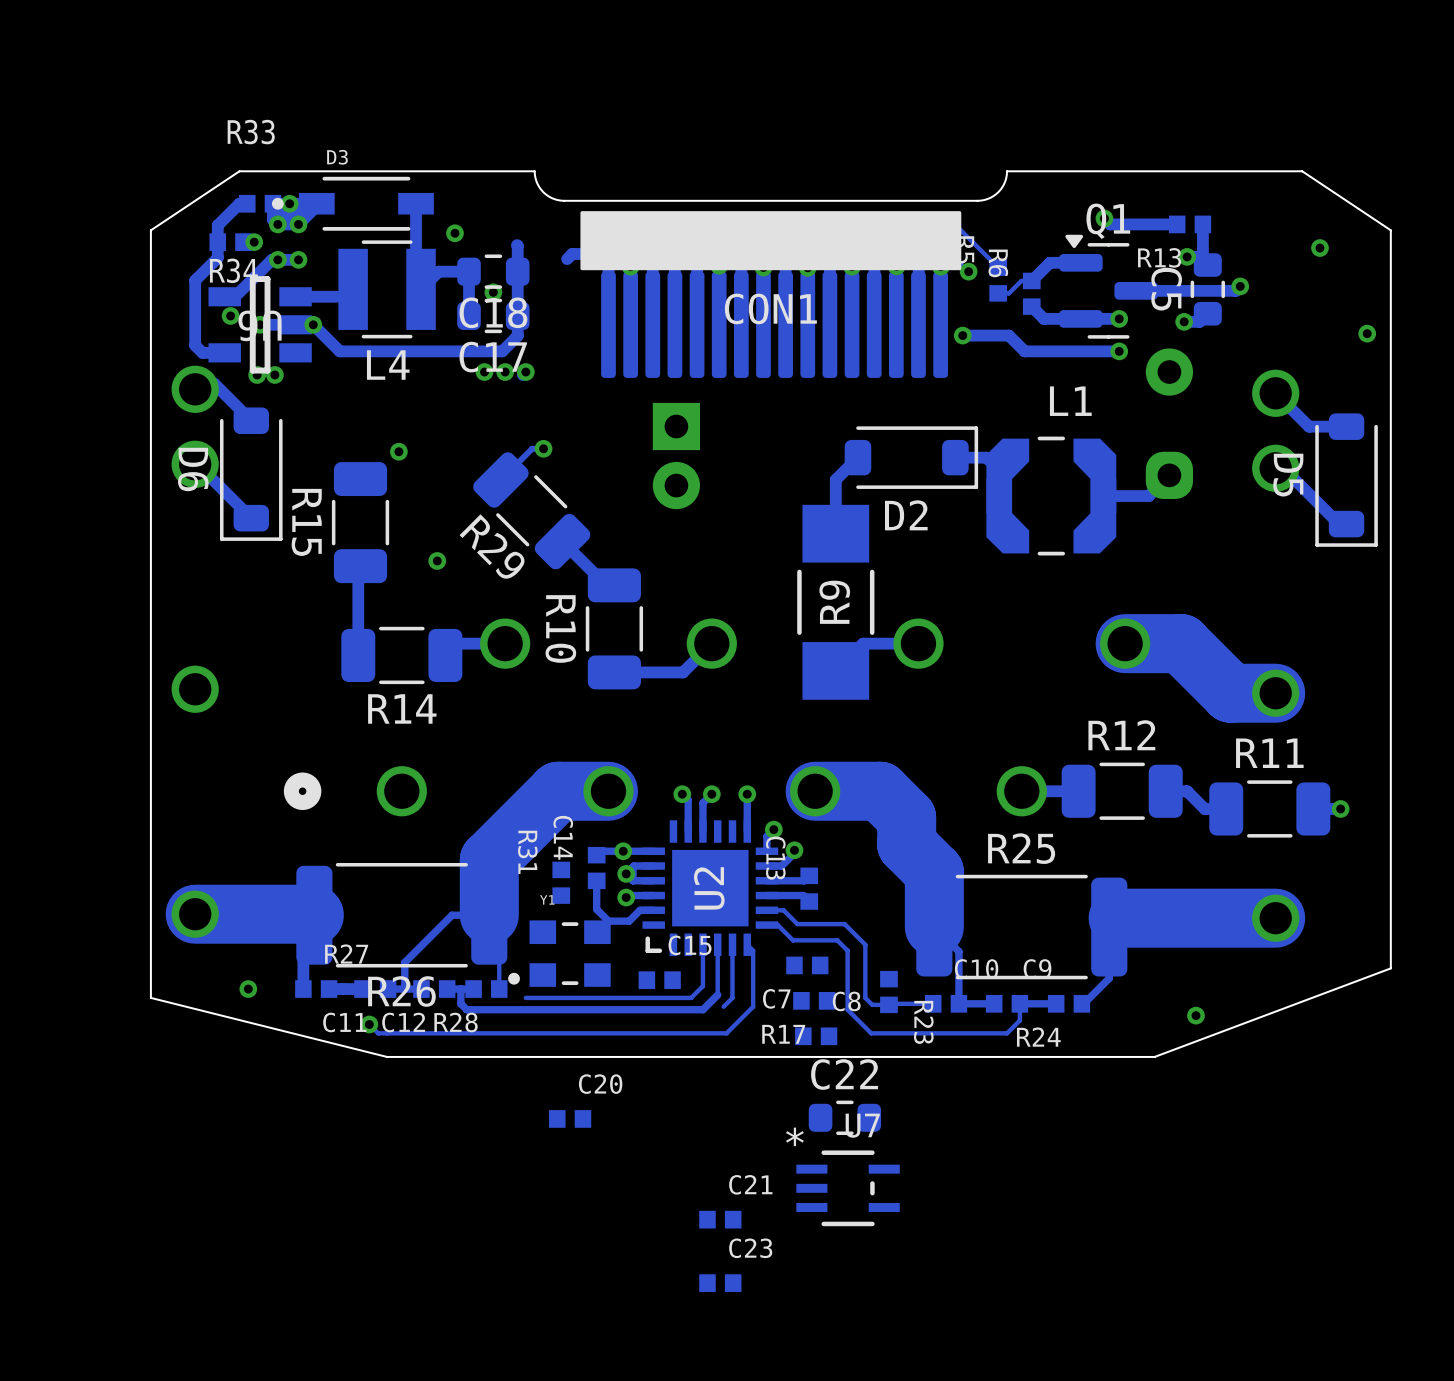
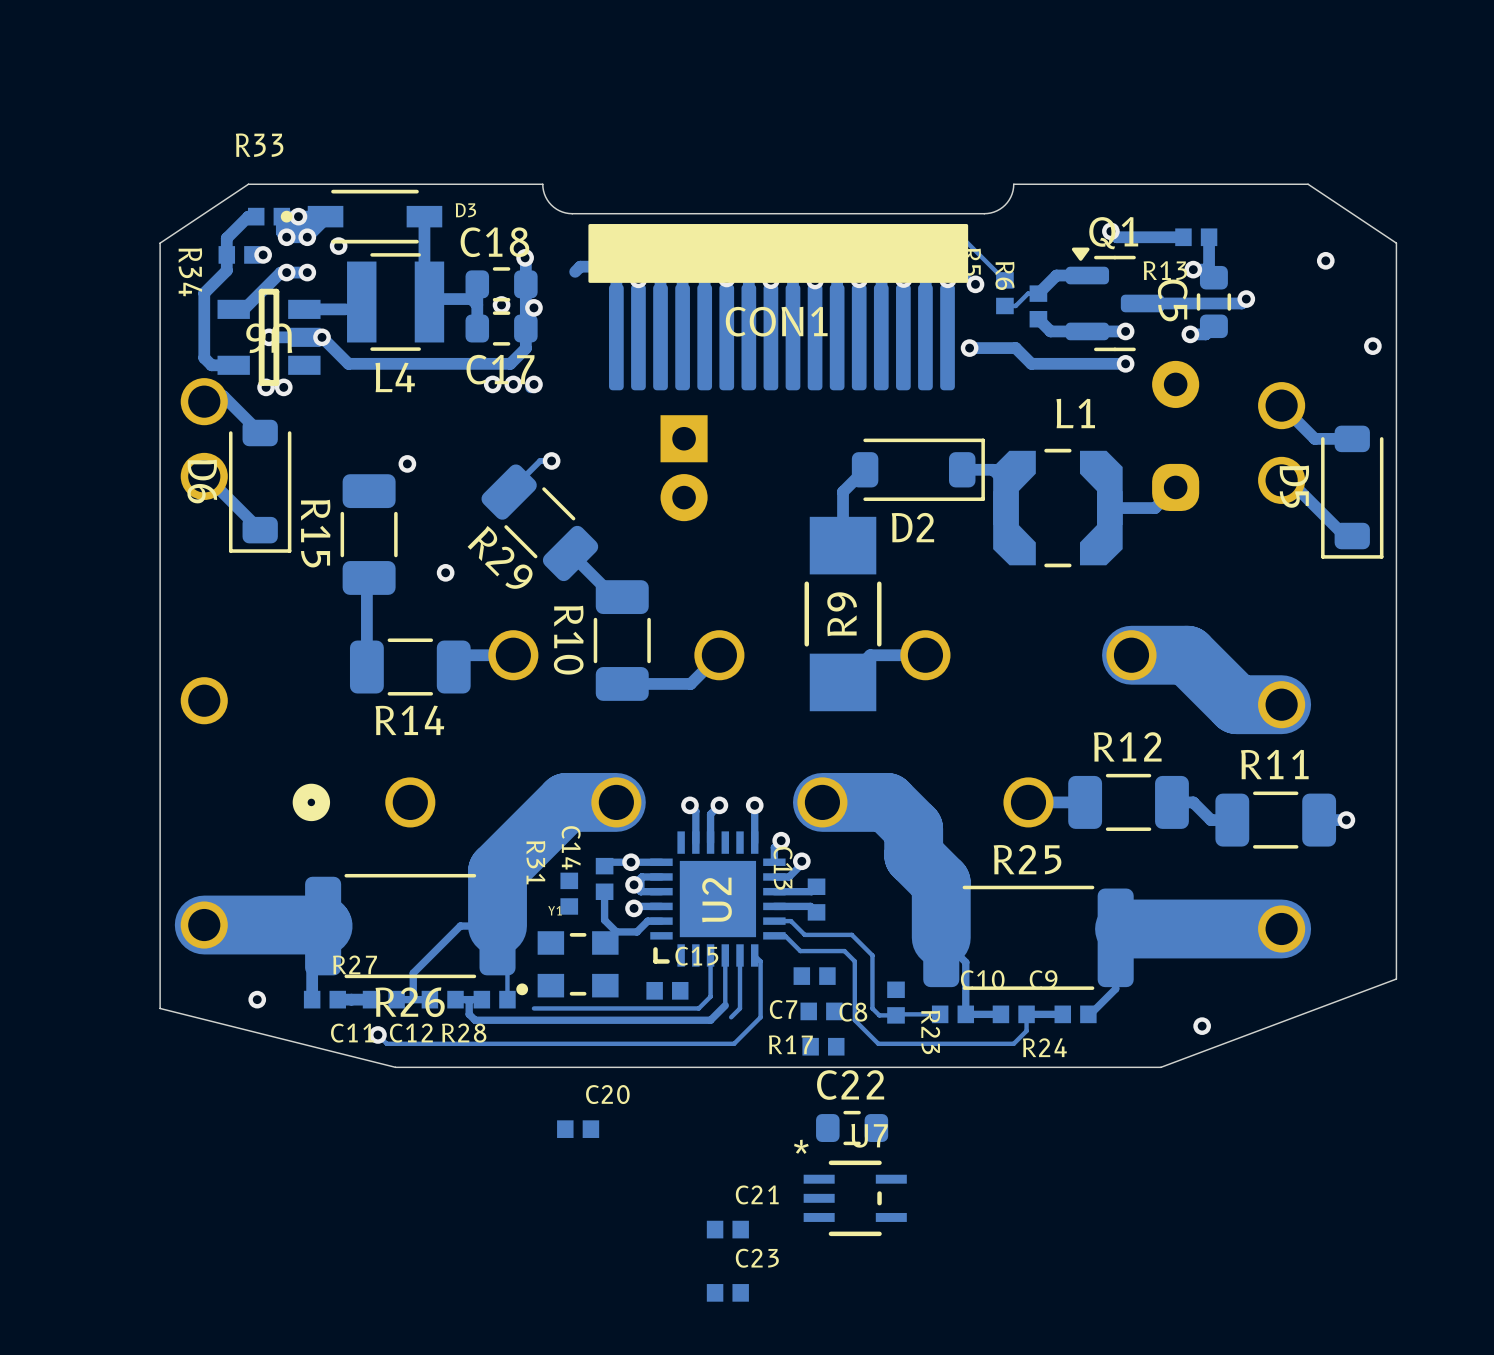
D3 name position: D3 (337, 157) -> D3 (465, 210)
via: none -> (338, 246)
via: (454, 233) -> none
via: none -> (525, 257)
R34 name rotation: 0° (233, 270) -> 90° clockwise (190, 272)
track: (469, 271) (438, 271) (423, 286) -> (477, 304) (471, 299) (432, 299)
via: none -> (533, 307)
C18 name position: C18 (493, 312) -> C18 (494, 242)
via: (230, 315) -> none

